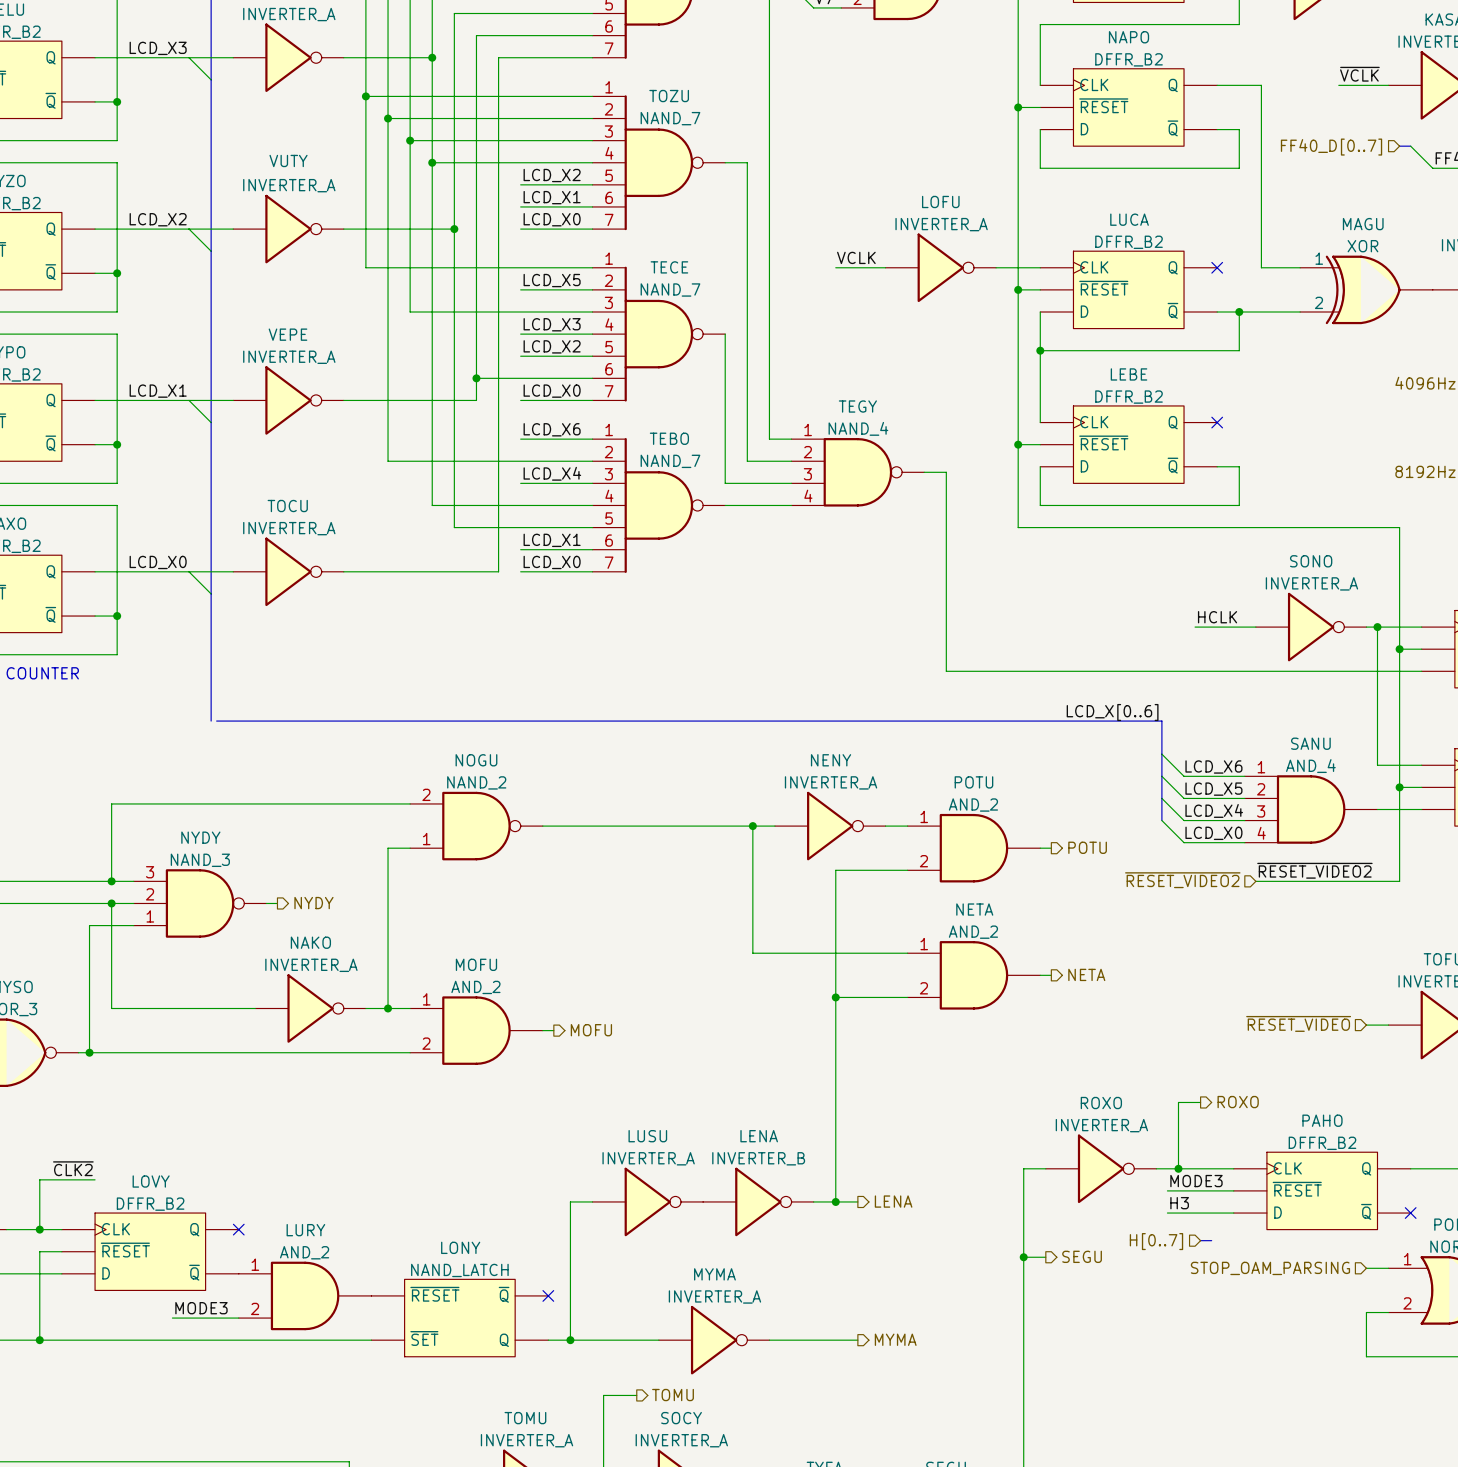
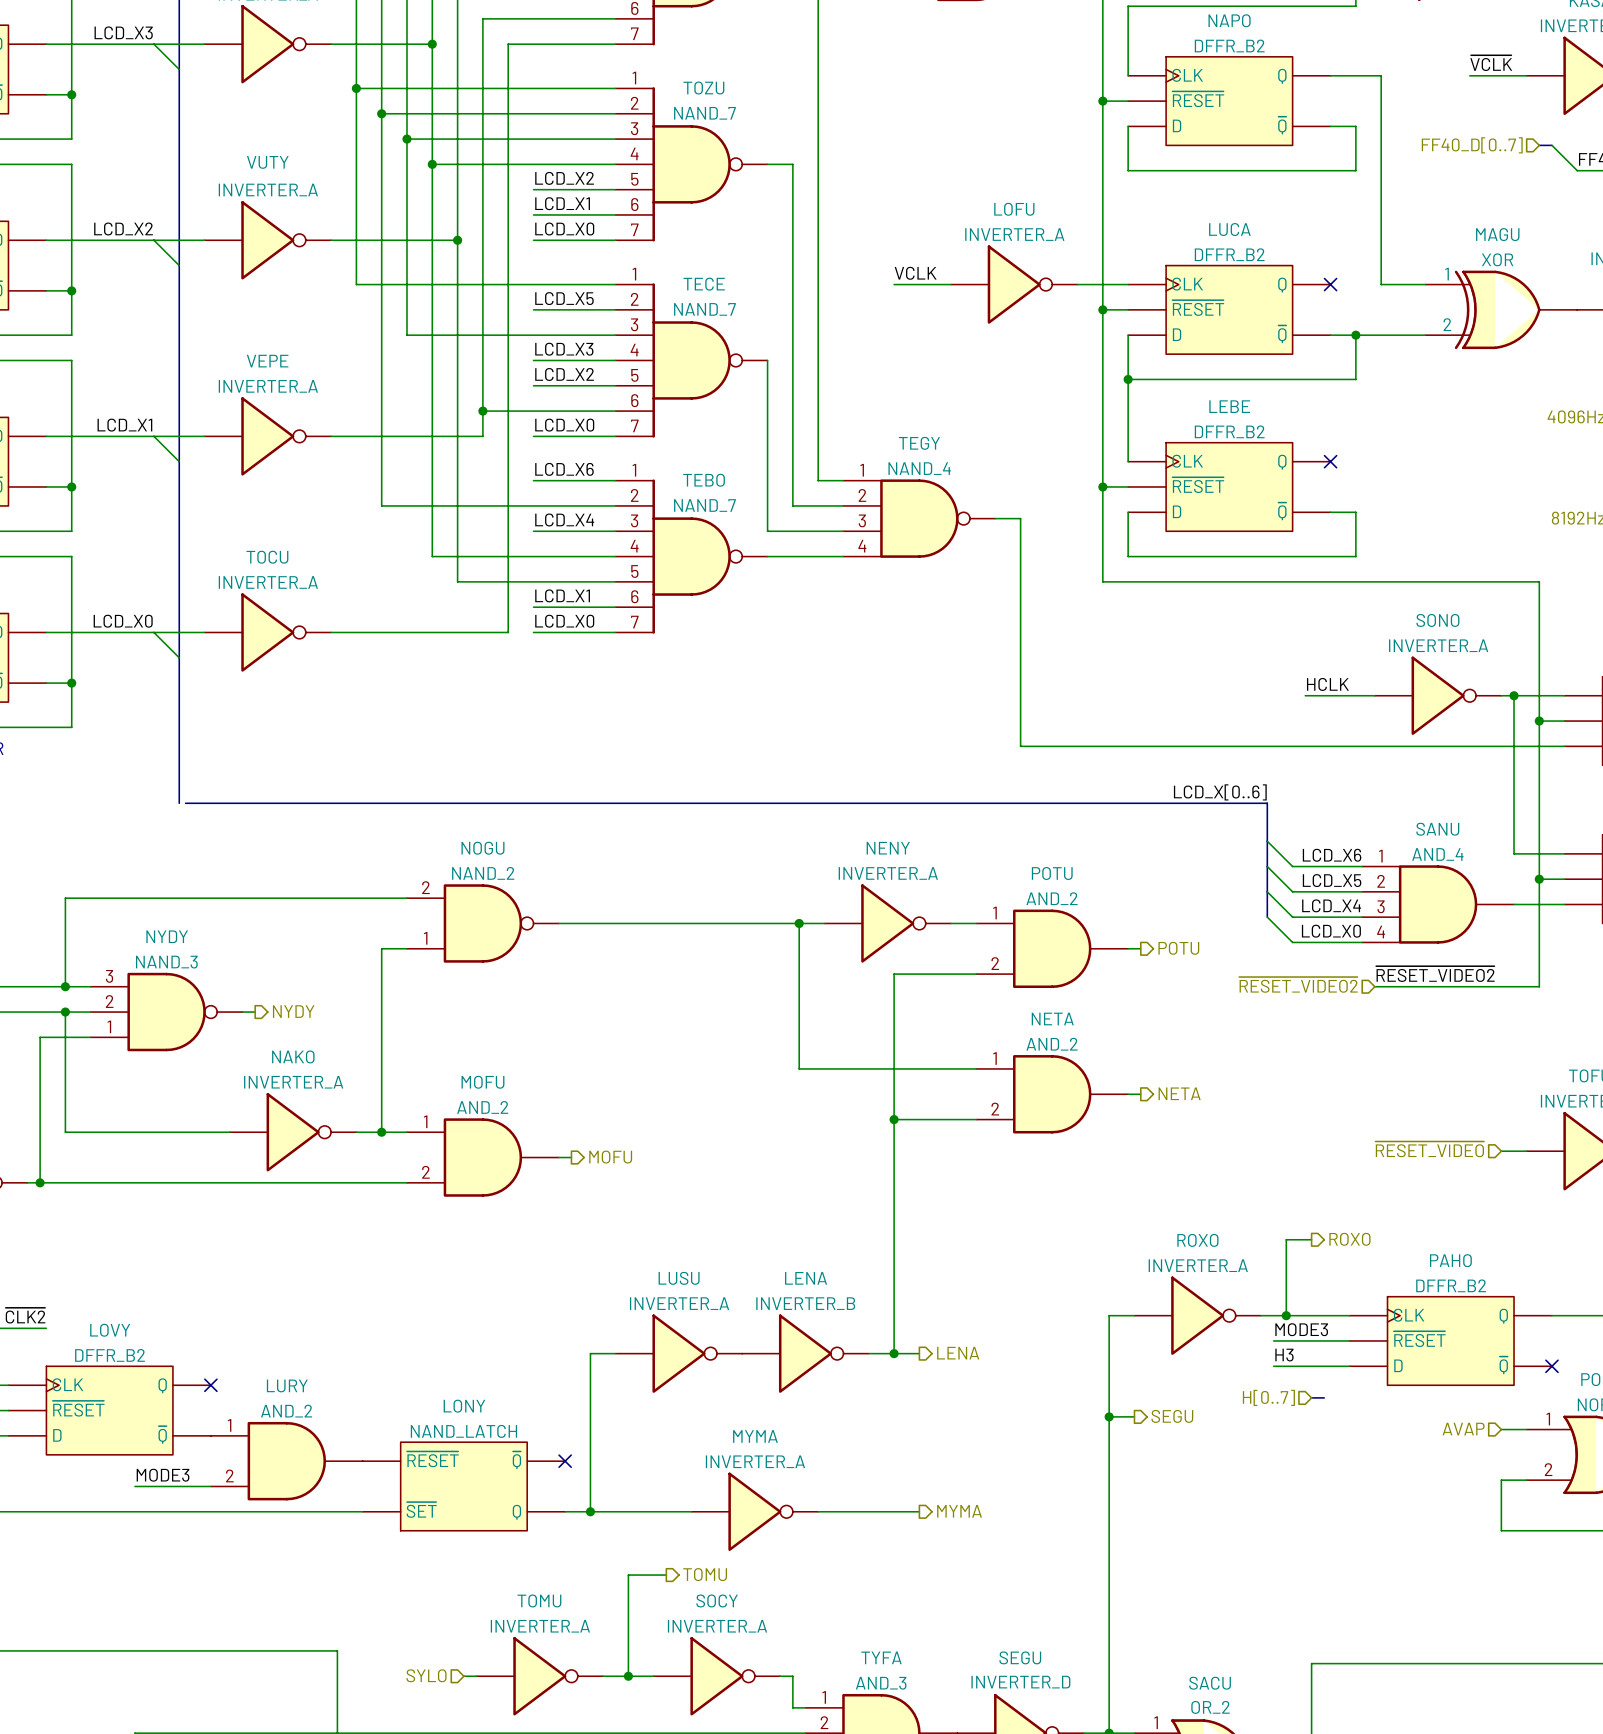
hierarchical label: STOP_OAM_PARSING (1270, 1268) -> AVAP (1463, 1429)

